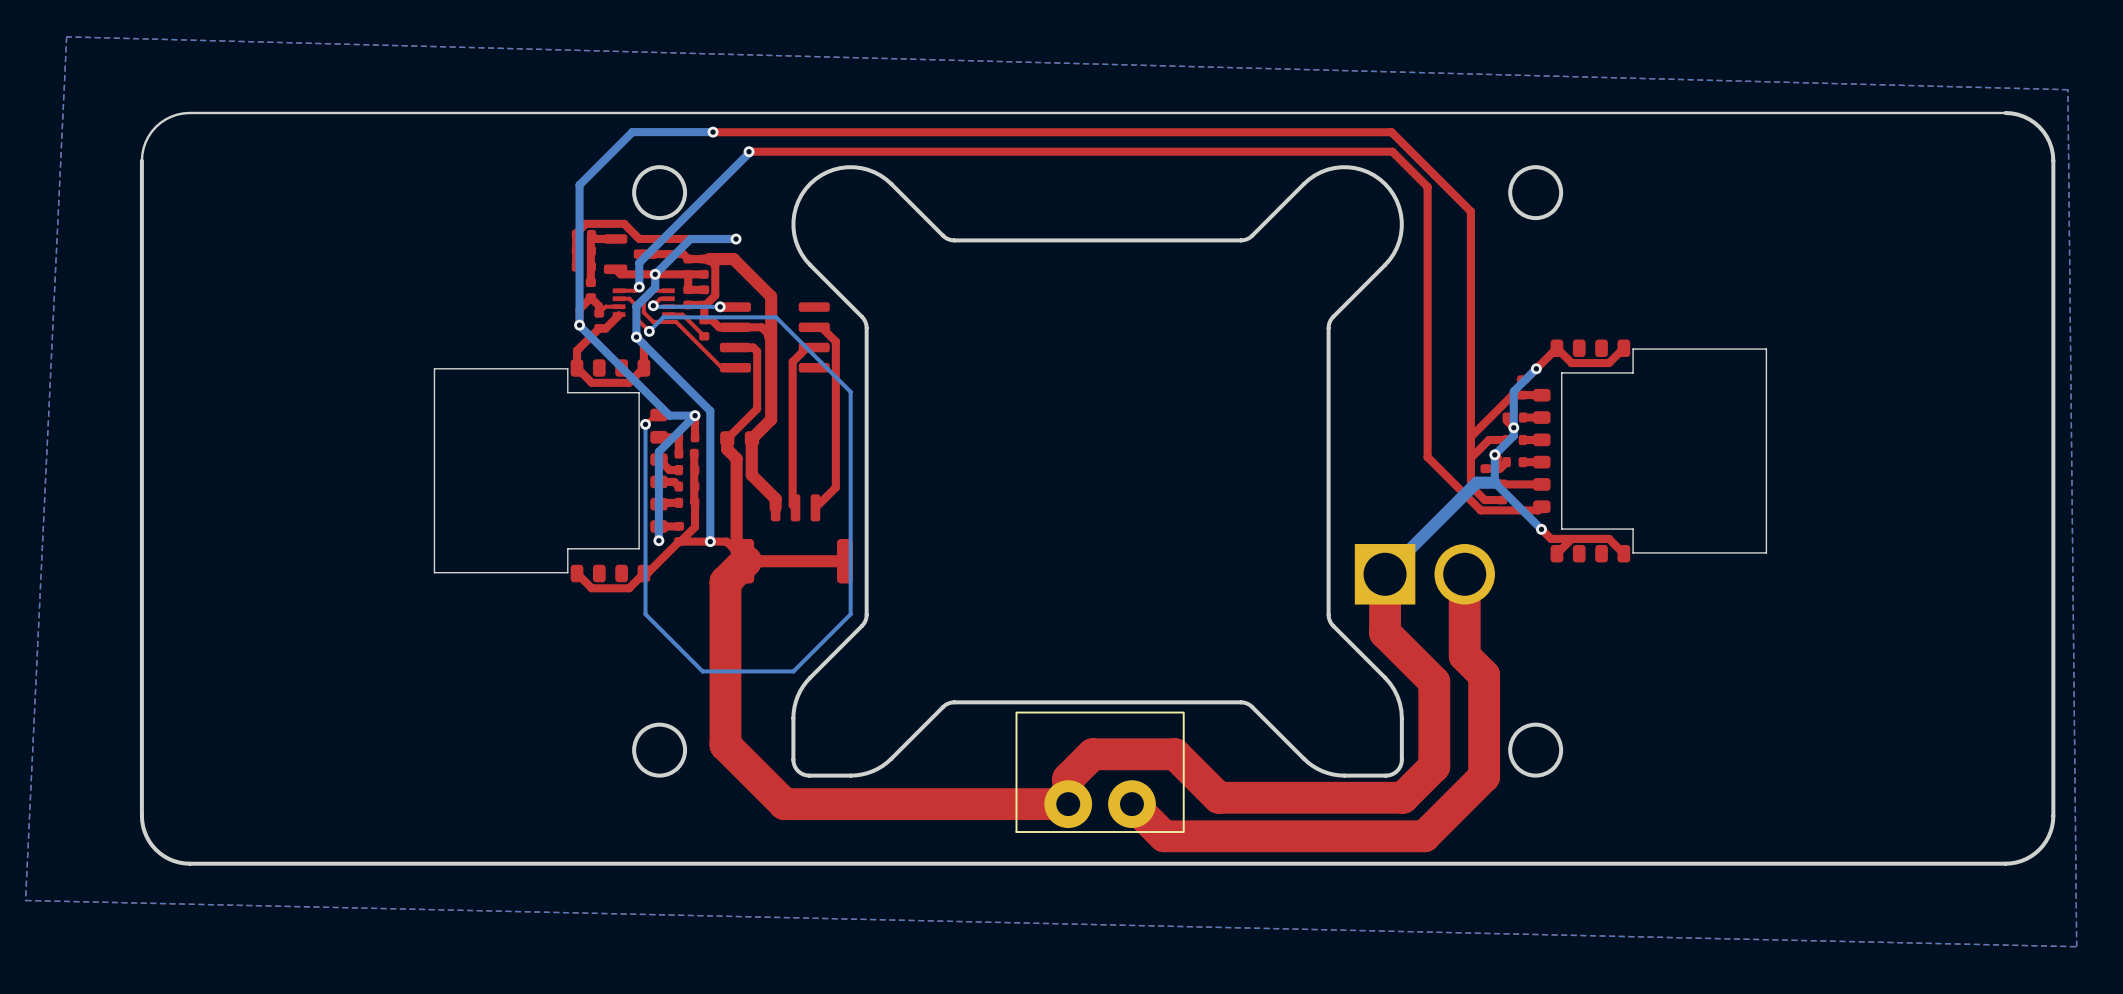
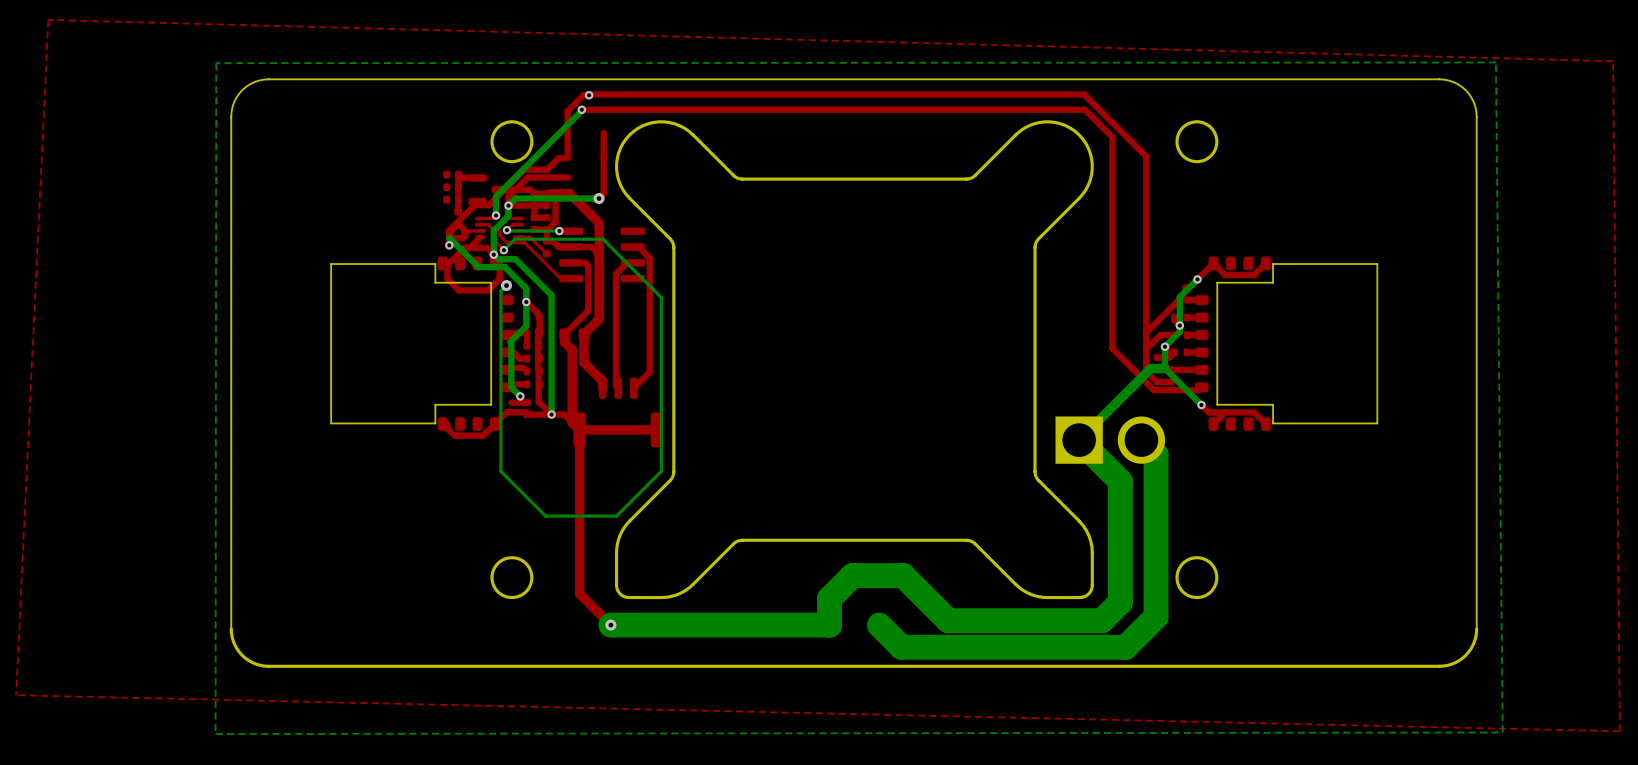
bottom zone outline: (66, 36) (2067, 89) (2076, 946) (25, 900) (66, 36) -> (1495, 62) (1502, 732) (215, 733) (216, 63) (1495, 62)
board edge: (2005, 112) (189, 112) (171, 116) (160, 122) (151, 131) (145, 142) (141, 160) (141, 815) (144, 831) (152, 845) (159, 853) (173, 861) (189, 863) (2005, 863) (2021, 861) (2035, 853) (2046, 841) (2052, 826) (2053, 815) (2053, 160) (2049, 142) (2039, 126) (2023, 116) (2005, 112) -> (1439, 79) (1453, 82) (1465, 90) (1473, 102) (1476, 116) (1476, 628) (1470, 648) (1455, 662) (1439, 666) (268, 666) (248, 660) (234, 645) (231, 628) (231, 116) (236, 98) (245, 87) (254, 82) (268, 79) (1439, 79)
bottom track: (713, 132) (632, 132) (579, 184) (579, 325) (669, 415) (695, 415) (658, 451) -> none
via position: (713, 132) -> (589, 95)
top track: (759, 132) (713, 132) -> (589, 94) (583, 95) (567, 111) (567, 158) (558, 158) (547, 169) (524, 169) (488, 205) (474, 205) (449, 230) (449, 238) (462, 238) (464, 235)
top track: none -> (603, 133) (603, 193) (599, 198)
top track: (735, 238) (639, 238) (624, 223) (585, 223) (576, 233) (576, 266) -> none
bottom track: (736, 239) (690, 239) (664, 265) -> (599, 198) (515, 198)
via: (736, 239) -> none
via: none -> (599, 198)
top track: (615, 269) (620, 274) (655, 274) -> (568, 177) (527, 177) (508, 196) (508, 205)
bottom track: none -> (449, 237) (478, 267) (504, 267) (526, 288) (526, 326) (510, 341)
top track: none -> (469, 247) (487, 247) (493, 254)
bottom track: (642, 342) (710, 411) -> (498, 259) (515, 259) (551, 295) (551, 312)
bottom track: none -> (506, 285) (500, 291) (500, 322)
via: none -> (506, 285)
top track: none -> (526, 302) (538, 314) (538, 317)
via: none -> (526, 302)
via: (695, 415) -> none
via: (645, 424) -> none
top track: none -> (538, 330) (538, 401) (551, 414)
top track: (694, 453) (695, 527) (680, 541) -> none
part position: (550, 470) -> (422, 343)
bottom track: (658, 506) (658, 540) -> (511, 387) (520, 396)
via position: (658, 540) -> (520, 396)
top track: (680, 541) (629, 588) (591, 588) (577, 573) -> (528, 414) (526, 412) (506, 412) (483, 435) (454, 435) (447, 428) (447, 424)
top track: (746, 561) (725, 581) (725, 745) (784, 804) (1068, 804) (1068, 778) (1092, 754) (1175, 754) (1218, 797) (1402, 797) (1434, 766) (1434, 681) (1385, 632) (1385, 574) -> (579, 429) (579, 593) (610, 625)
bottom track: none -> (1079, 440) (1120, 481) (1120, 602) (1101, 620) (948, 620) (903, 575) (852, 575) (829, 598) (829, 625) (610, 625)
top track: (1464, 574) (1464, 655) (1484, 675) (1484, 776) (1424, 836) (1164, 836) (1131, 804) -> none
bottom track: none -> (1141, 440) (1156, 454) (1156, 616) (1125, 647) (901, 647) (879, 625)
part: (1100, 772) -> none
via: none -> (610, 625)

